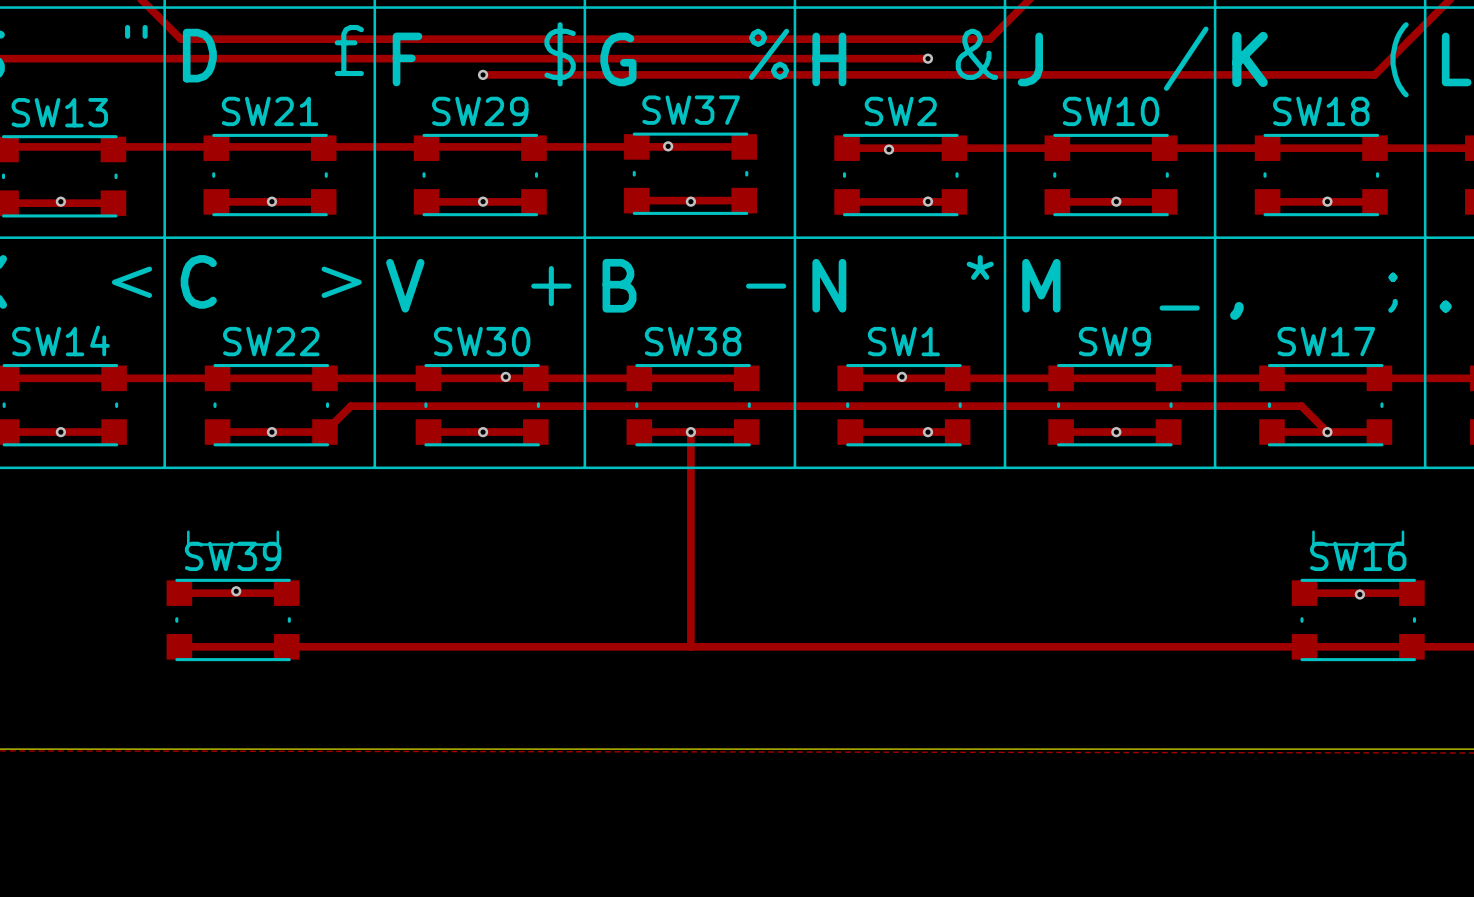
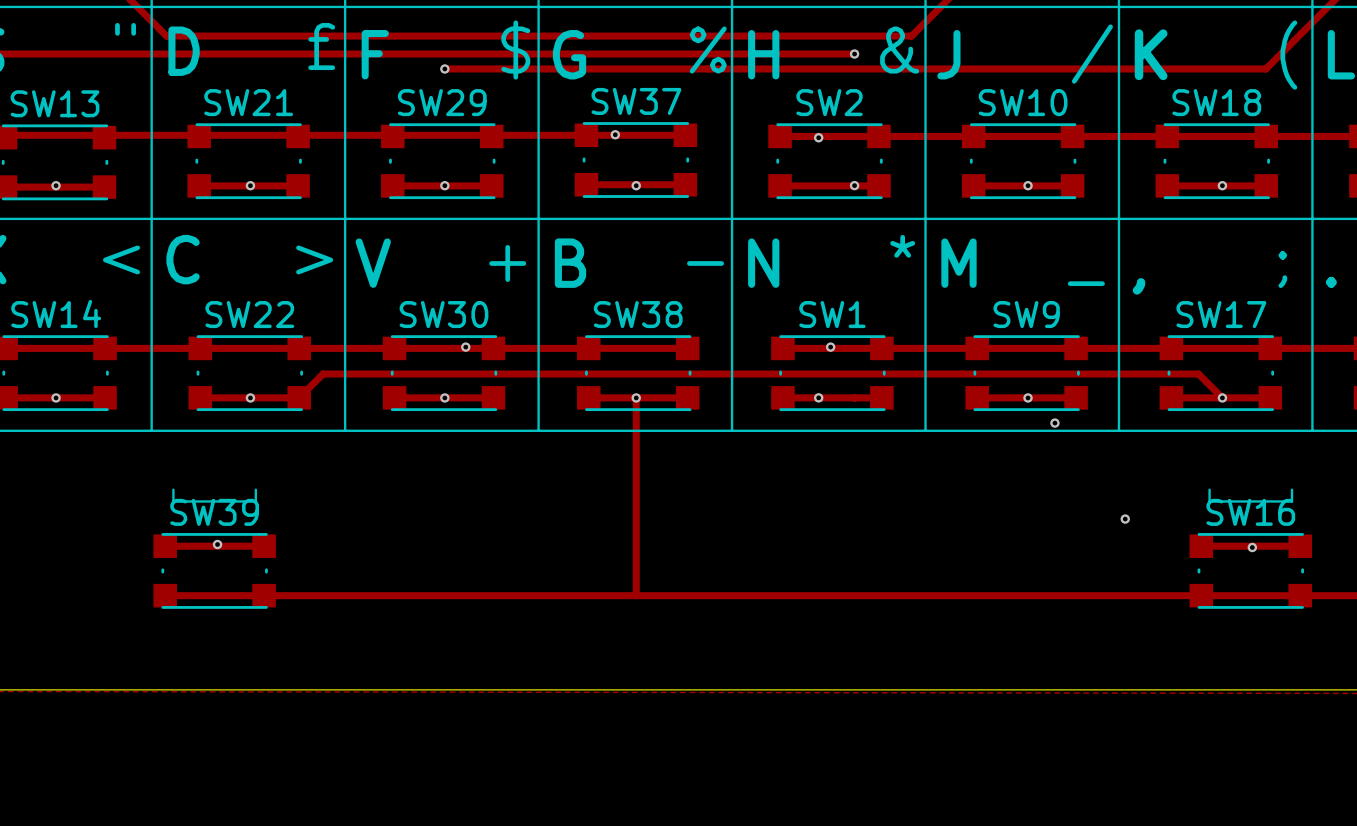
via position: (927, 432) -> (818, 397)
via: none -> (1054, 423)
via: none -> (1125, 519)

